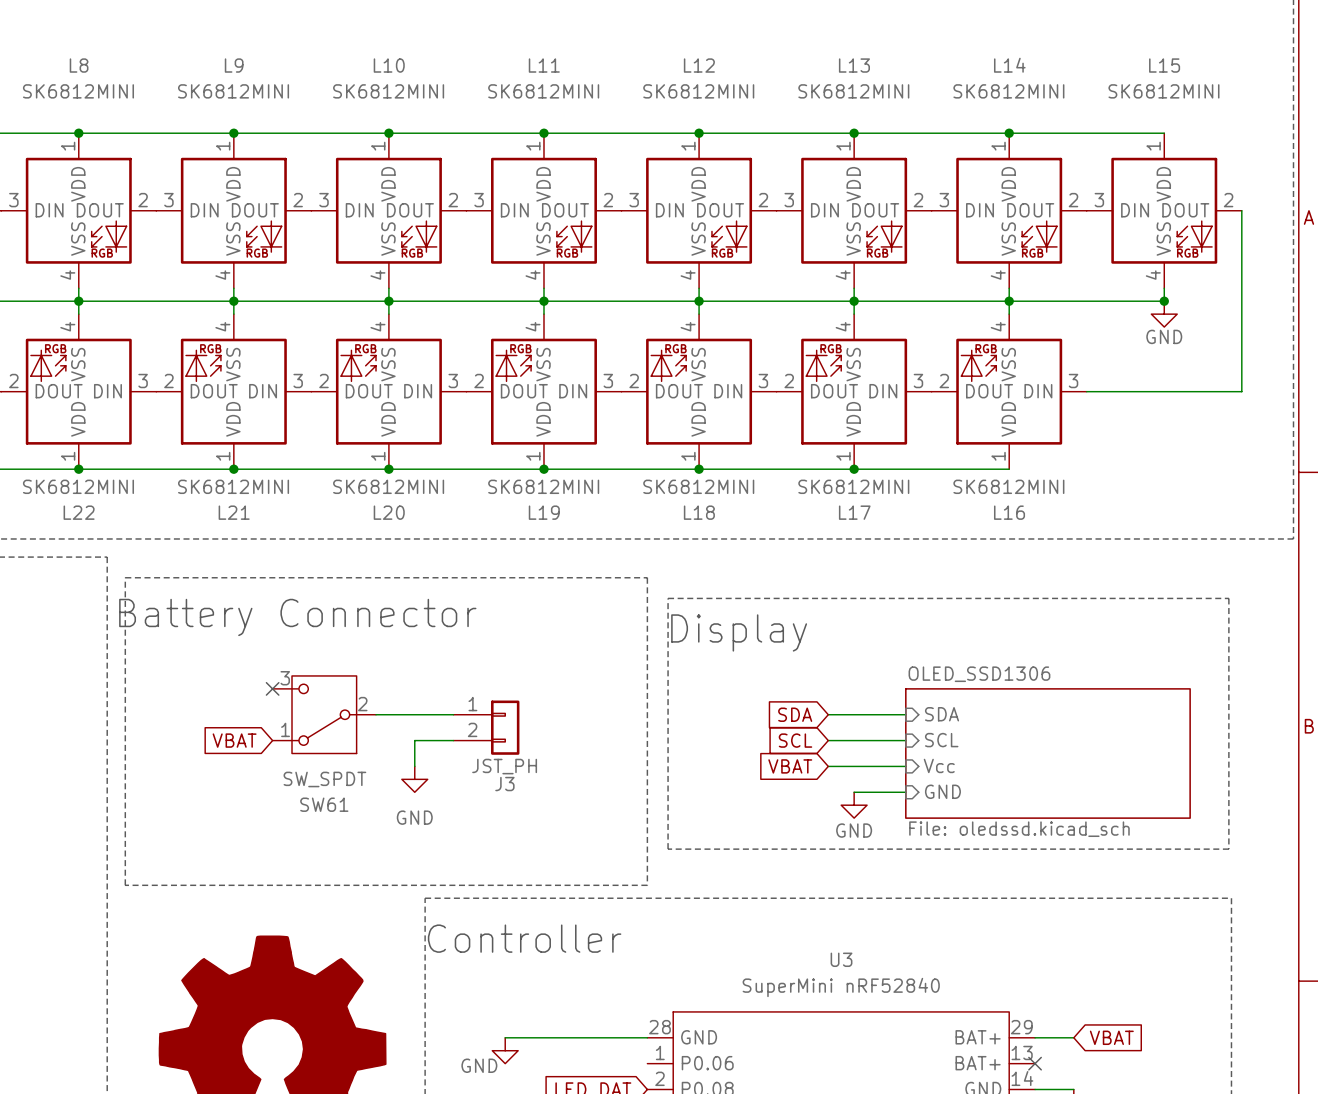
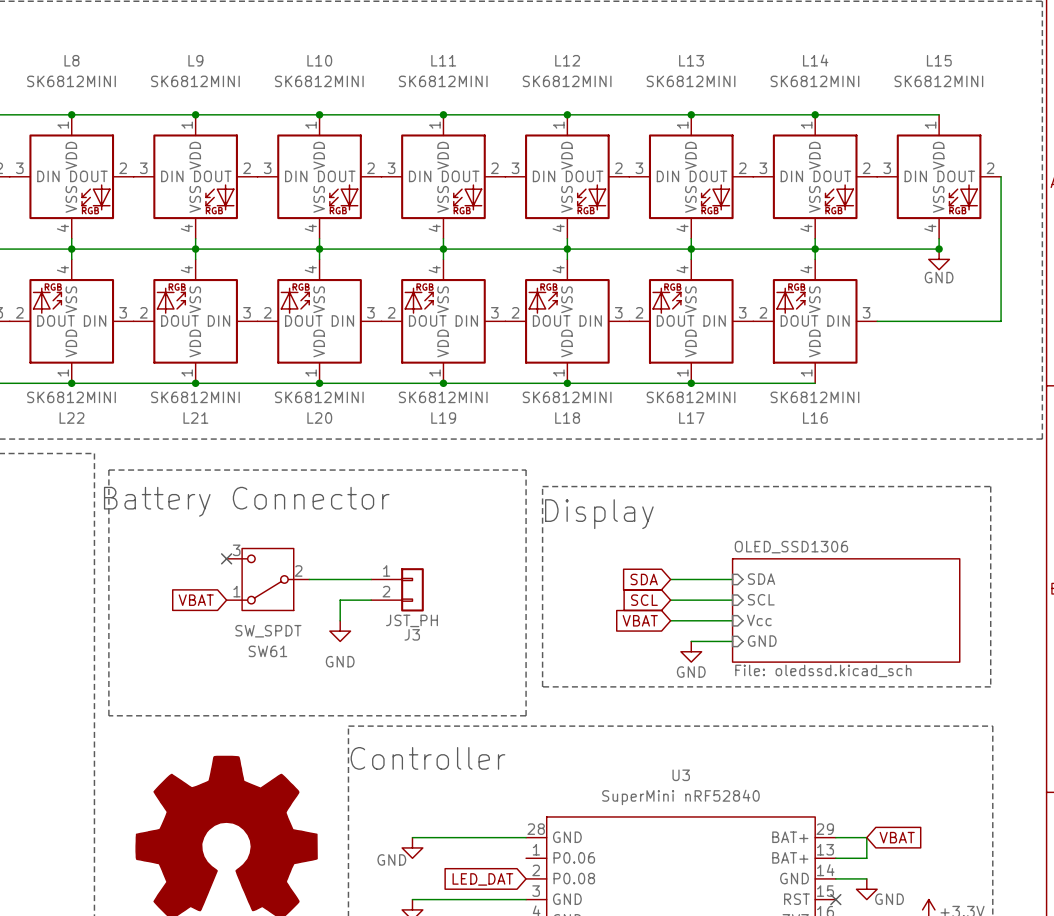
wire: none -> (866, 837) (866, 858) (835, 858)
no-connect mark: (1035, 1063) -> none

